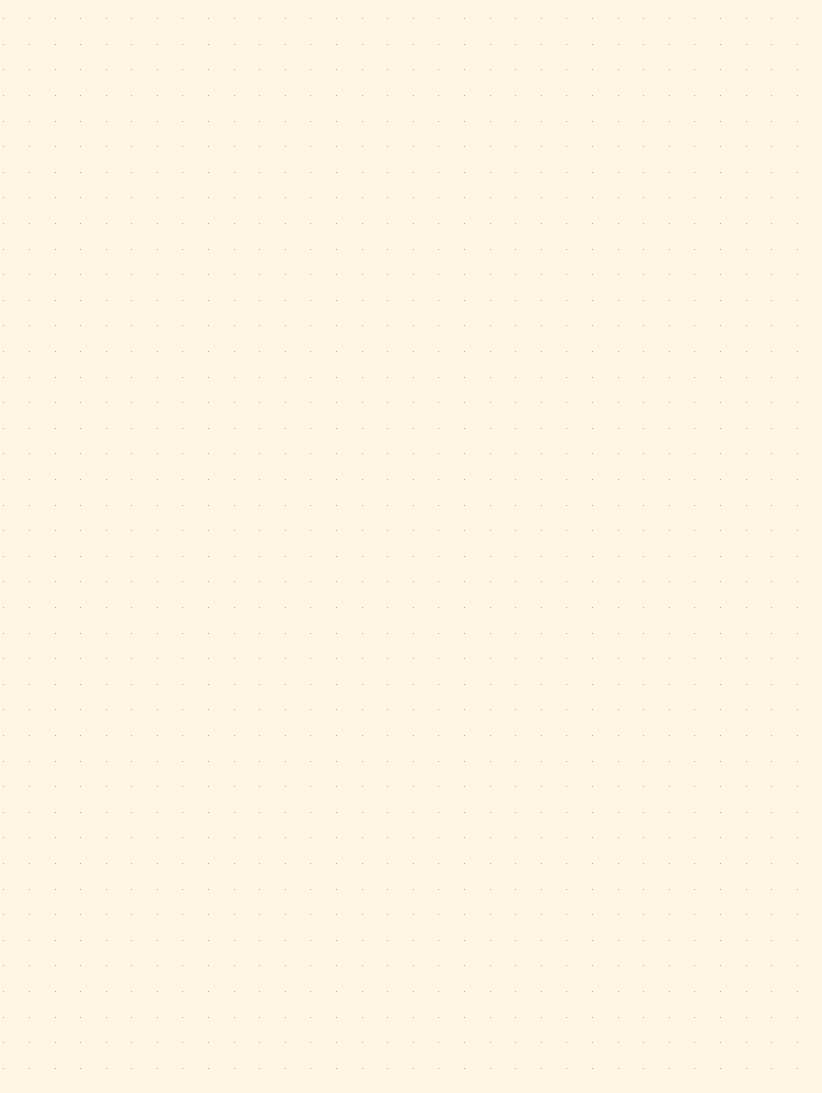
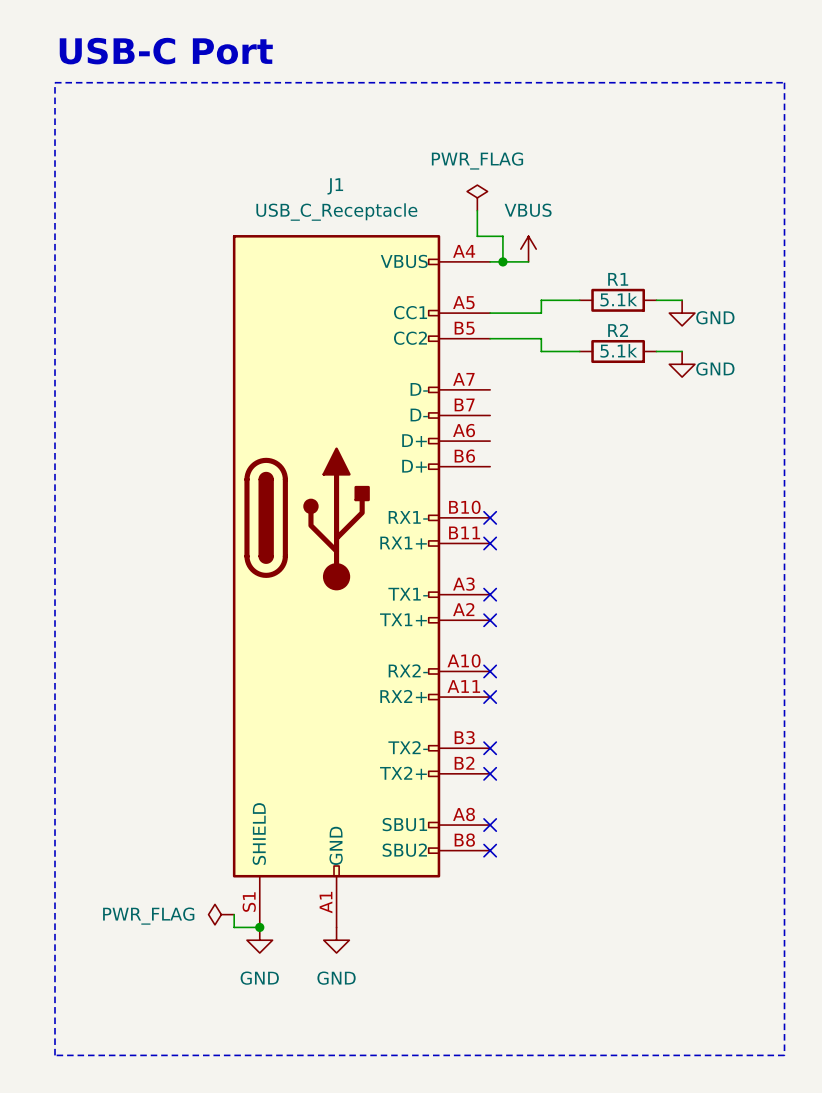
text: none -> USB-C Port (166, 51)
line: none -> (55, 82) (784, 82) (784, 1055) (55, 1055) (55, 82)
power symbol: none -> PWR_FLAG (477, 197)
wire: none -> (477, 210) (477, 236) (502, 236) (502, 261)
power symbol: none -> VBUS (528, 249)
wire: none -> (490, 261) (528, 261)
junction: none -> (502, 261)
wire: none -> (579, 300) (541, 300) (541, 313) (490, 313)
R1: none -> 5.1k (618, 300)
wire: none -> (656, 300) (682, 300)
power symbol: none -> GND (682, 313)
wire: none -> (490, 338) (541, 338) (541, 351) (579, 351)
R2: none -> 5.1k (618, 351)
wire: none -> (656, 351) (682, 351)
power symbol: none -> GND (682, 364)
no-connect mark: none -> (490, 517)
no-connect mark: none -> (490, 543)
J1: none -> USB_C_Receptacle (361, 581)
no-connect mark: none -> (490, 594)
no-connect mark: none -> (490, 620)
no-connect mark: none -> (490, 671)
no-connect mark: none -> (490, 697)
no-connect mark: none -> (490, 748)
no-connect mark: none -> (490, 773)
no-connect mark: none -> (490, 825)
no-connect mark: none -> (490, 850)
power symbol: none -> PWR_FLAG (221, 914)
wire: none -> (234, 914) (234, 927) (259, 927)
junction: none -> (259, 927)
power symbol: none -> GND (259, 940)
power symbol: none -> GND (336, 940)

